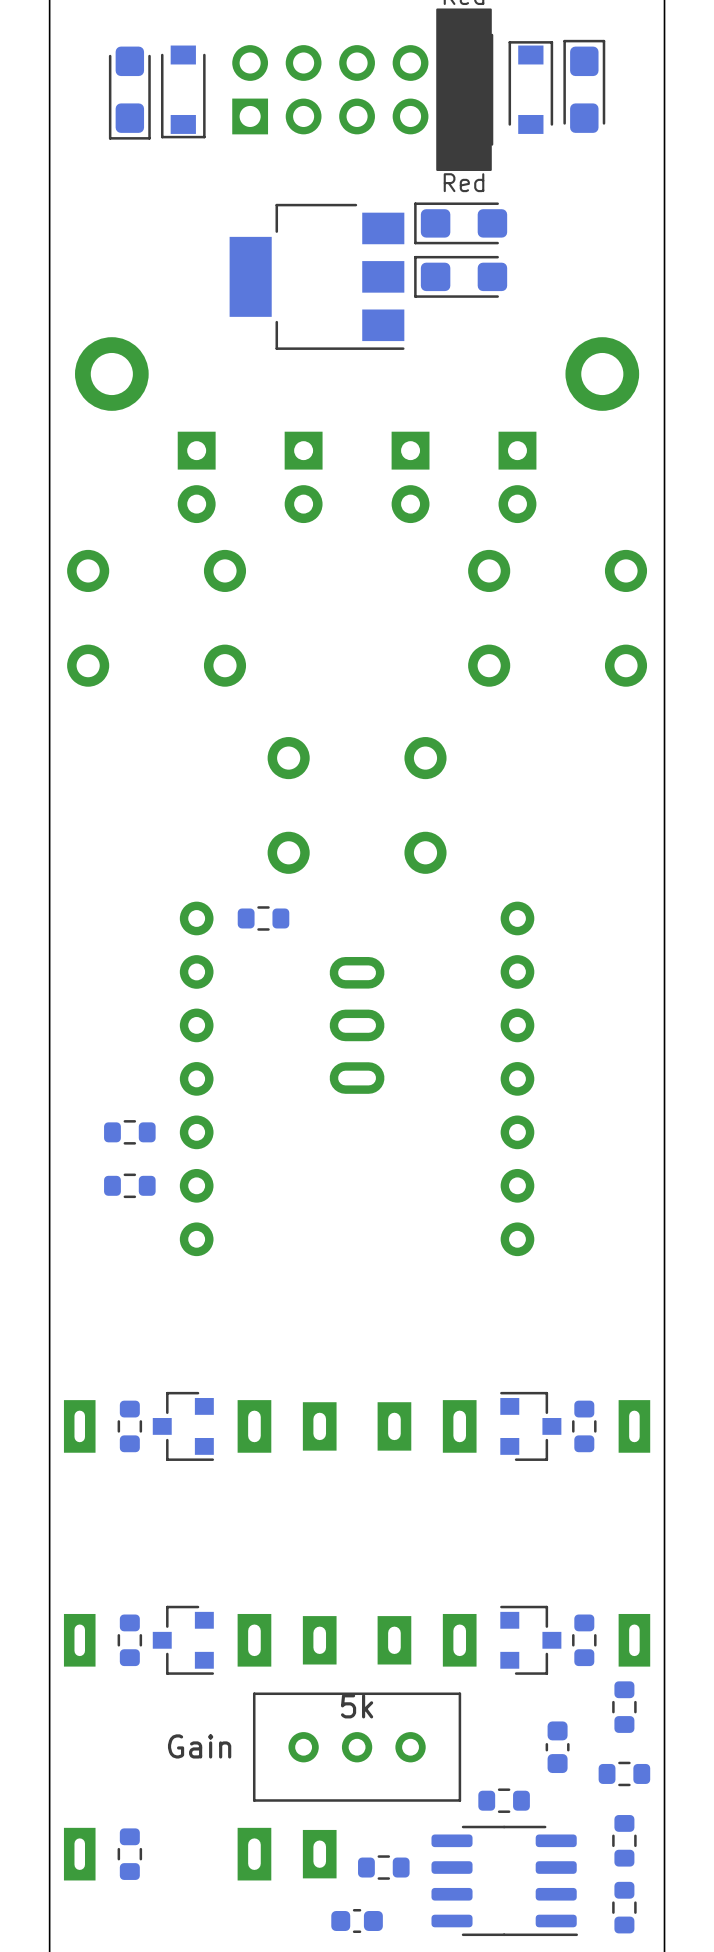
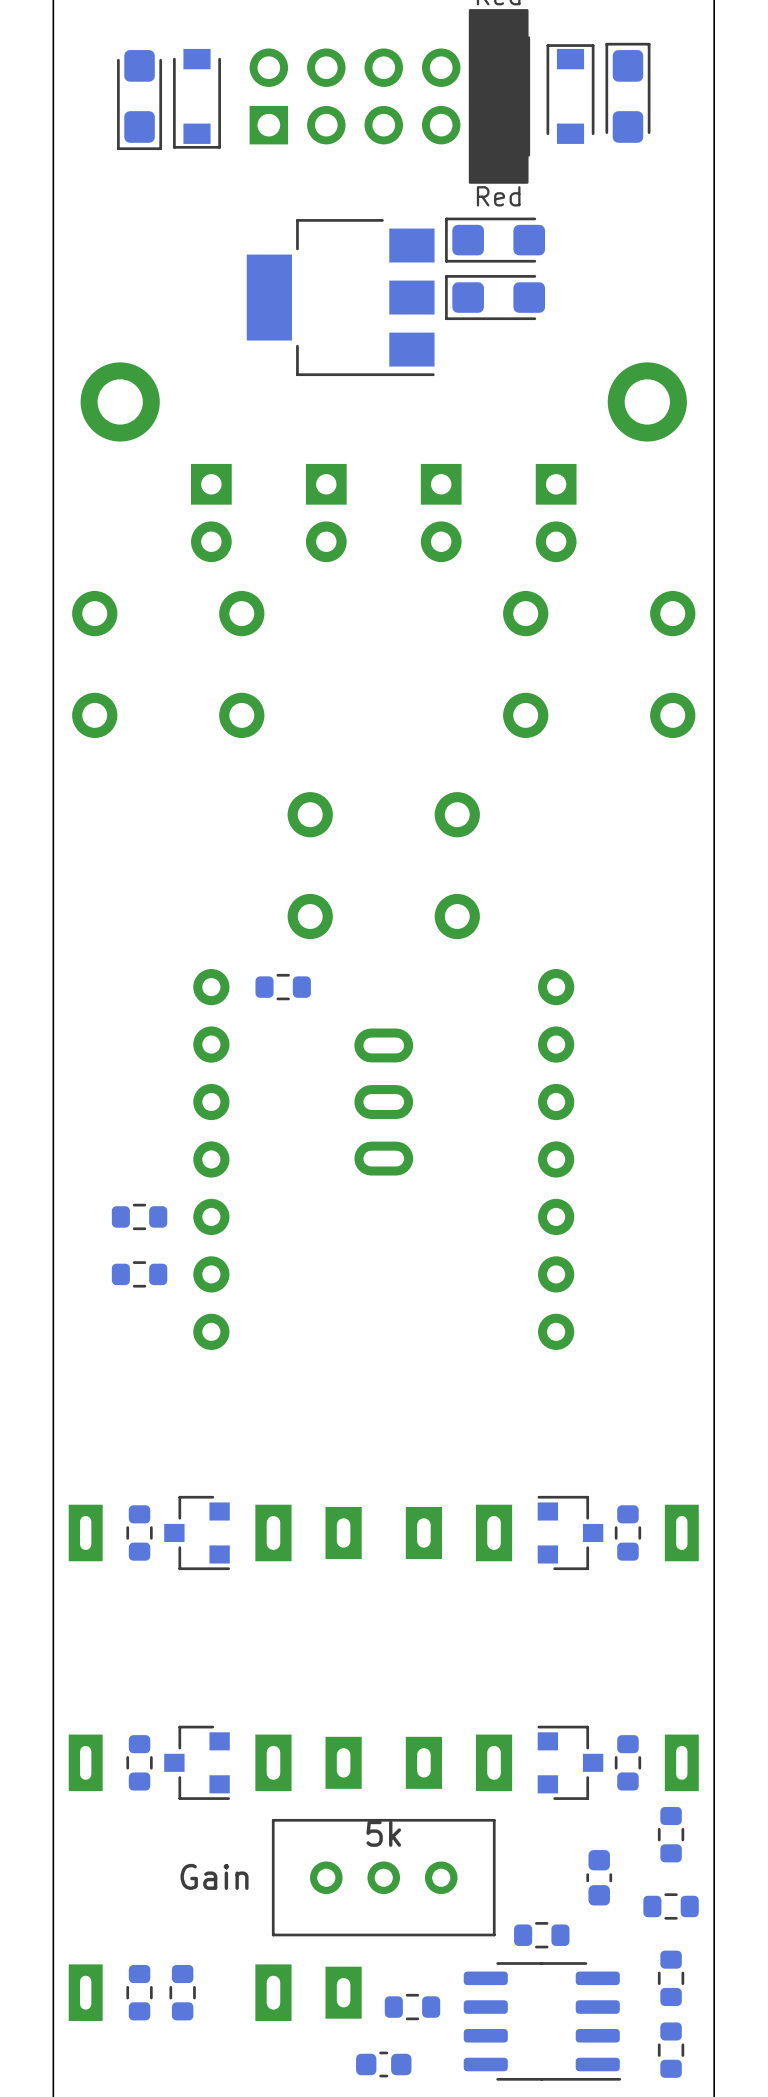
part: none -> (182, 1992)

